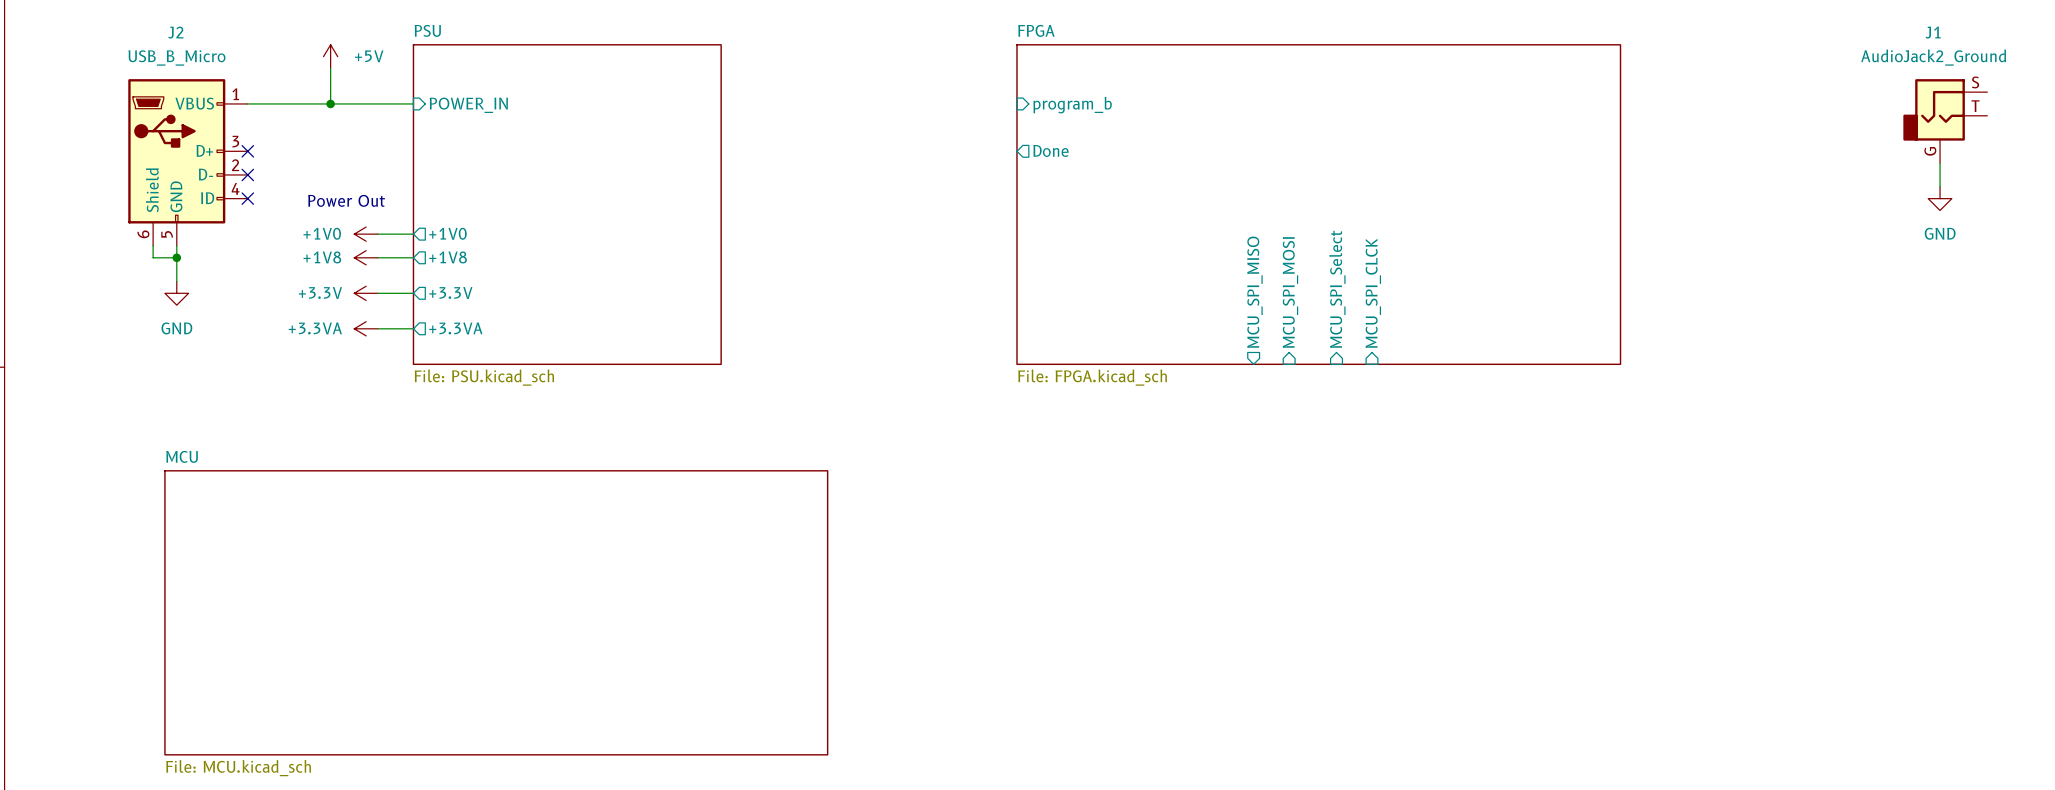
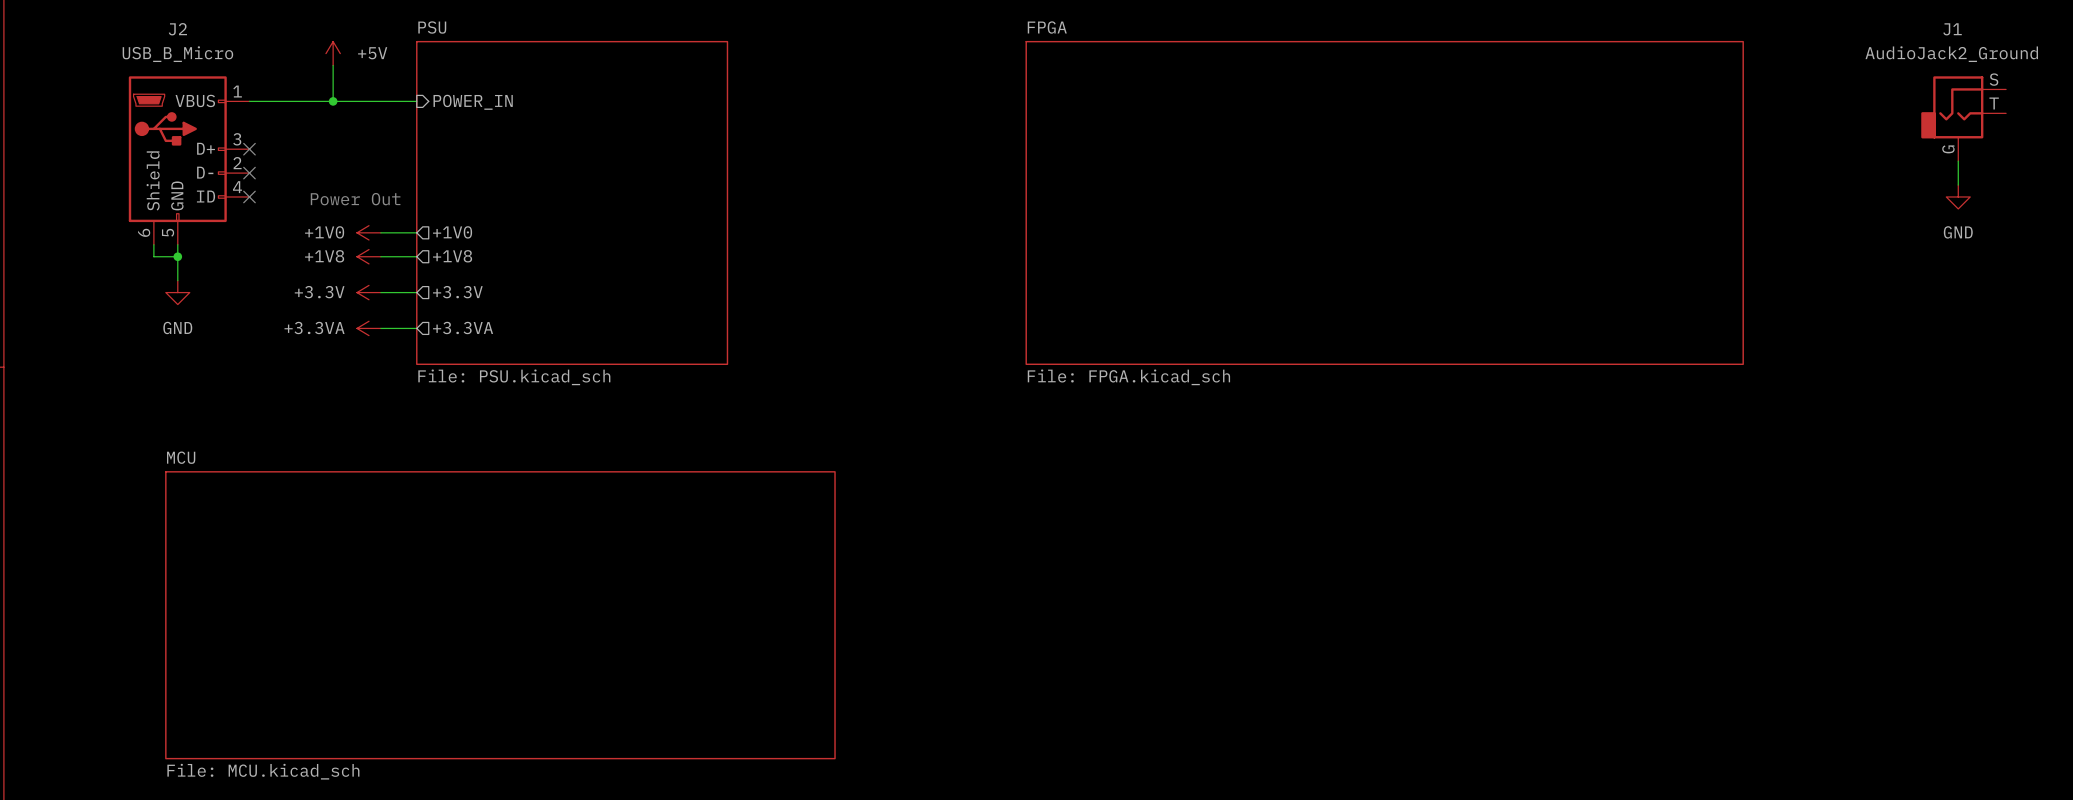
sheet pin: program_b (1072, 105) -> none
sheet pin: Done (1050, 150) -> none
sheet FPGA: File: FPGA.kicad_sch (1318, 204) -> none
sheet FPGA: none -> File: FPGA.kicad_sch (1384, 202)
sheet pin: MCU_SPI_Select (1337, 289) -> none
sheet pin: MCU_SPI_MISO (1254, 292) -> none
sheet pin: MCU_SPI_MOSI (1290, 292) -> none
sheet pin: MCU_SPI_CLCK (1373, 293) -> none

